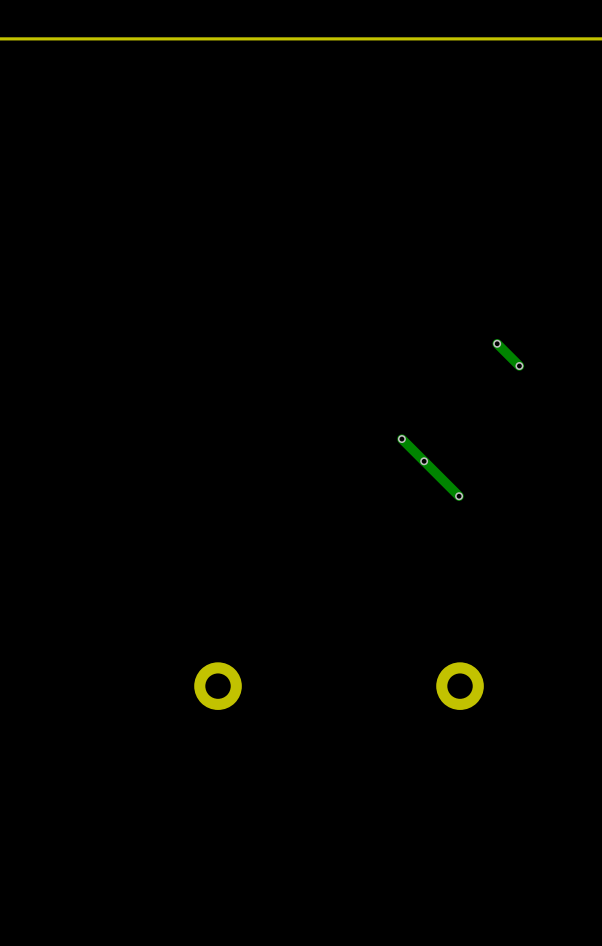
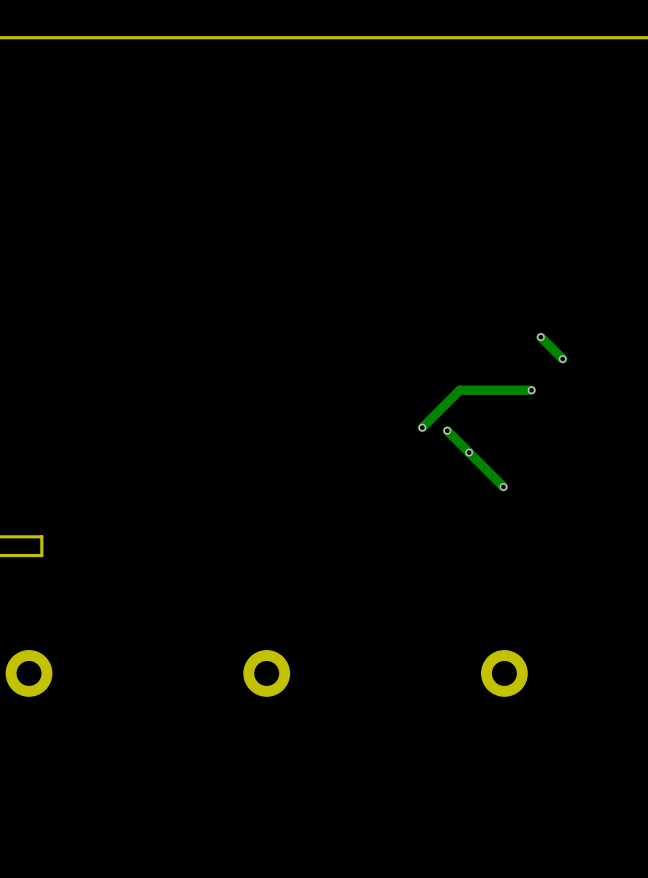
track: none -> (531, 390) (459, 390) (422, 427)
via: none -> (531, 390)
via: none -> (422, 427)

